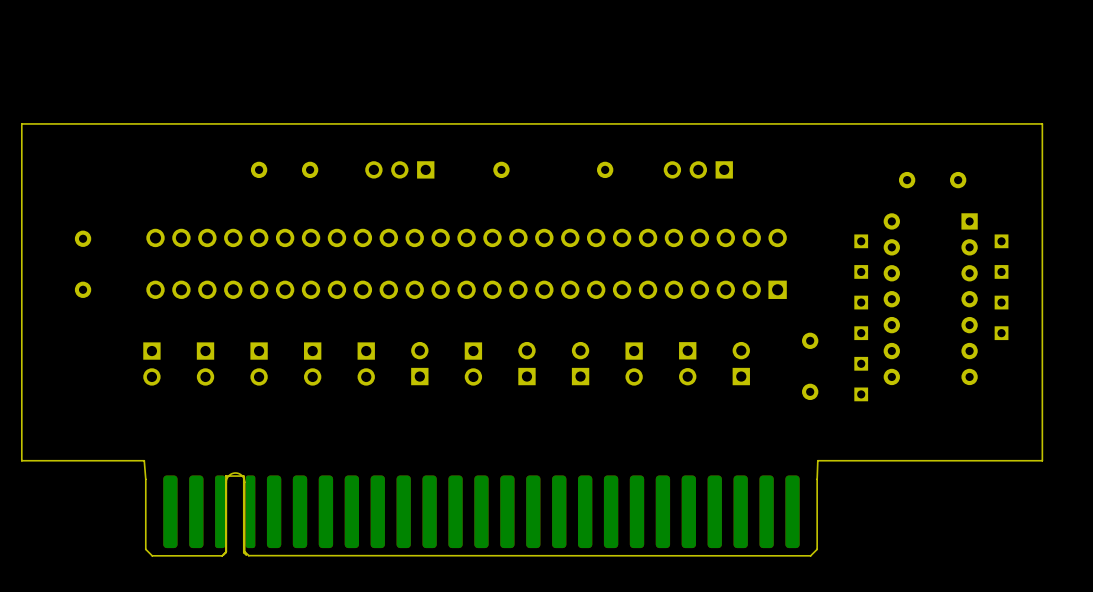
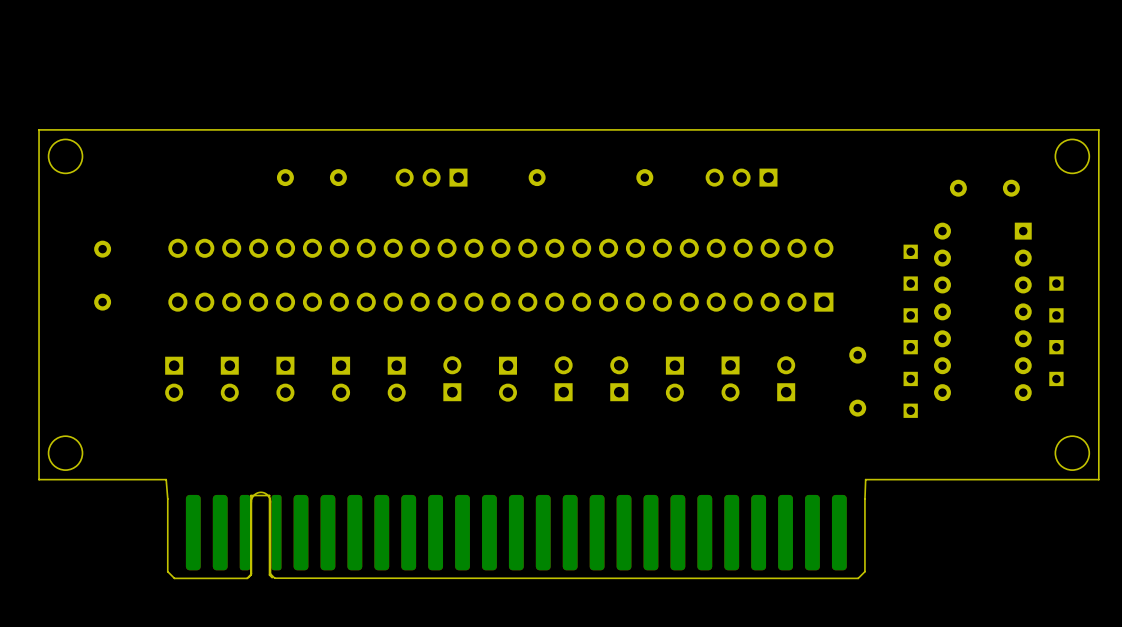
round board edge: none -> [48, 139, 83, 174]
round board edge: none -> [1055, 139, 1090, 174]
part position: (1001, 241) -> (1056, 378)
round board edge: none -> [48, 435, 83, 471]
round board edge: none -> [1055, 435, 1090, 471]

